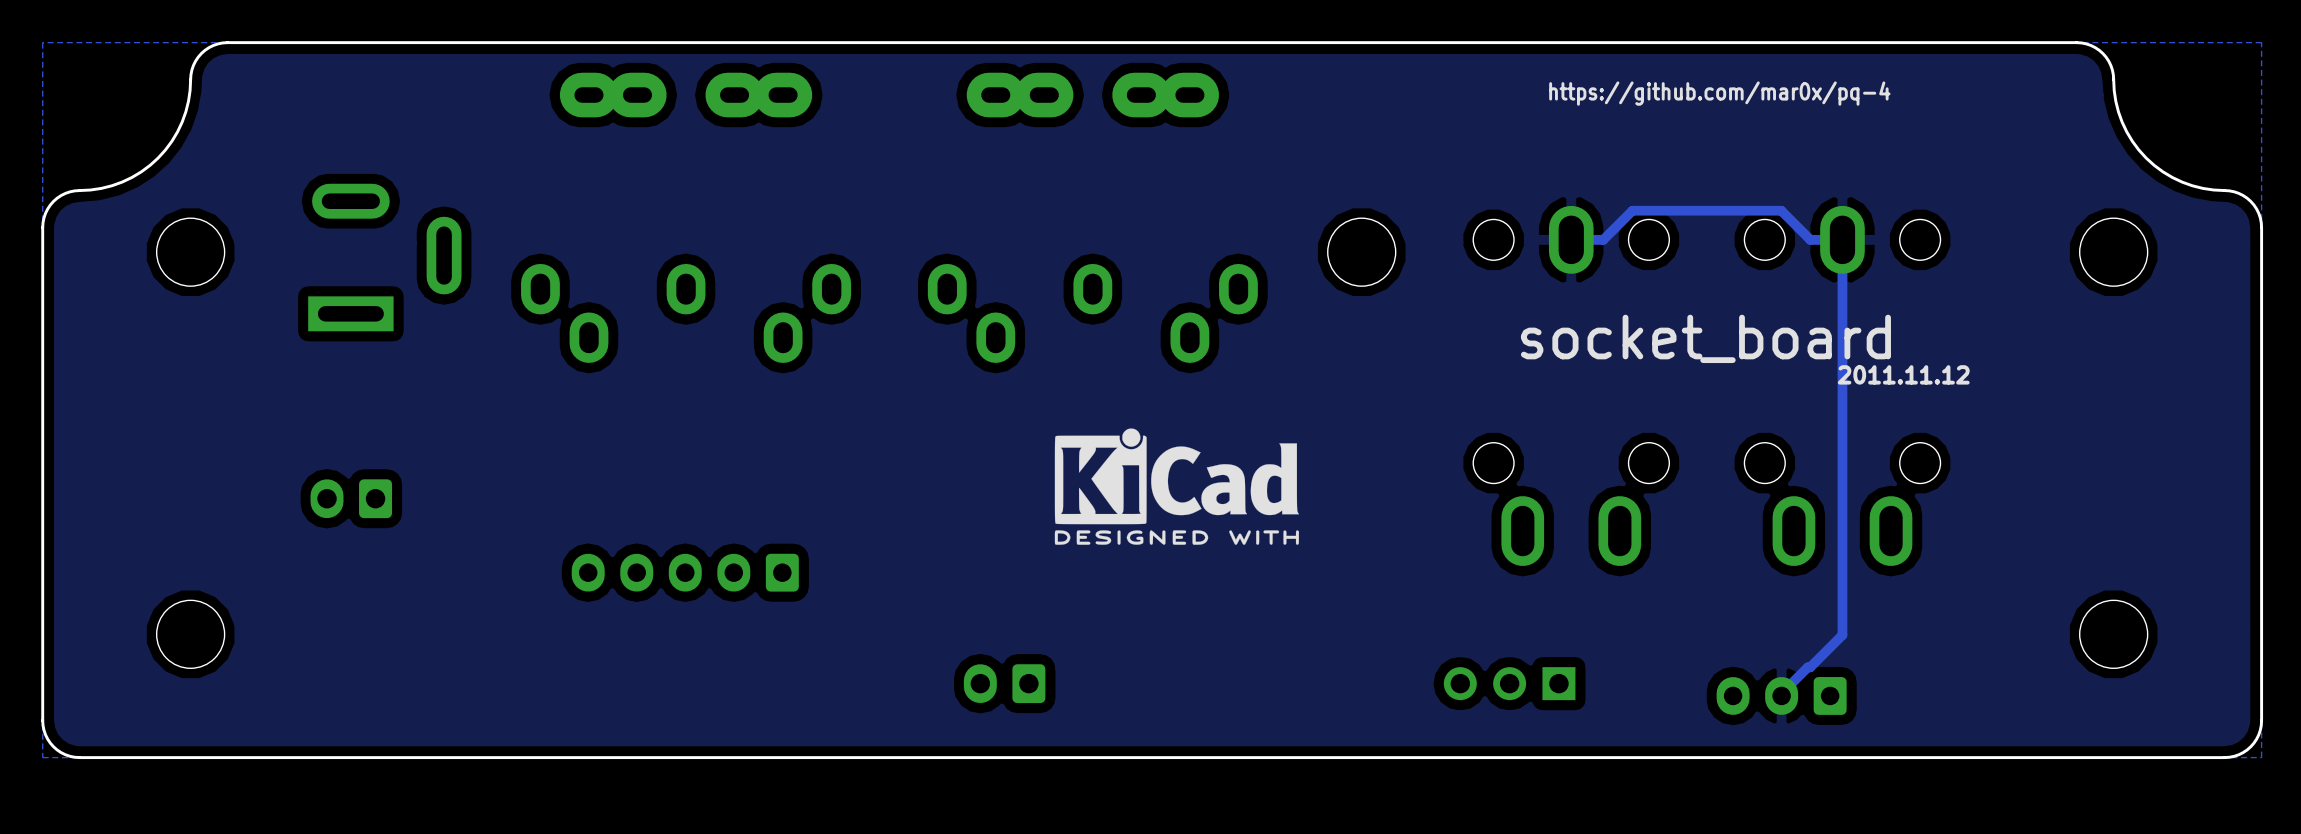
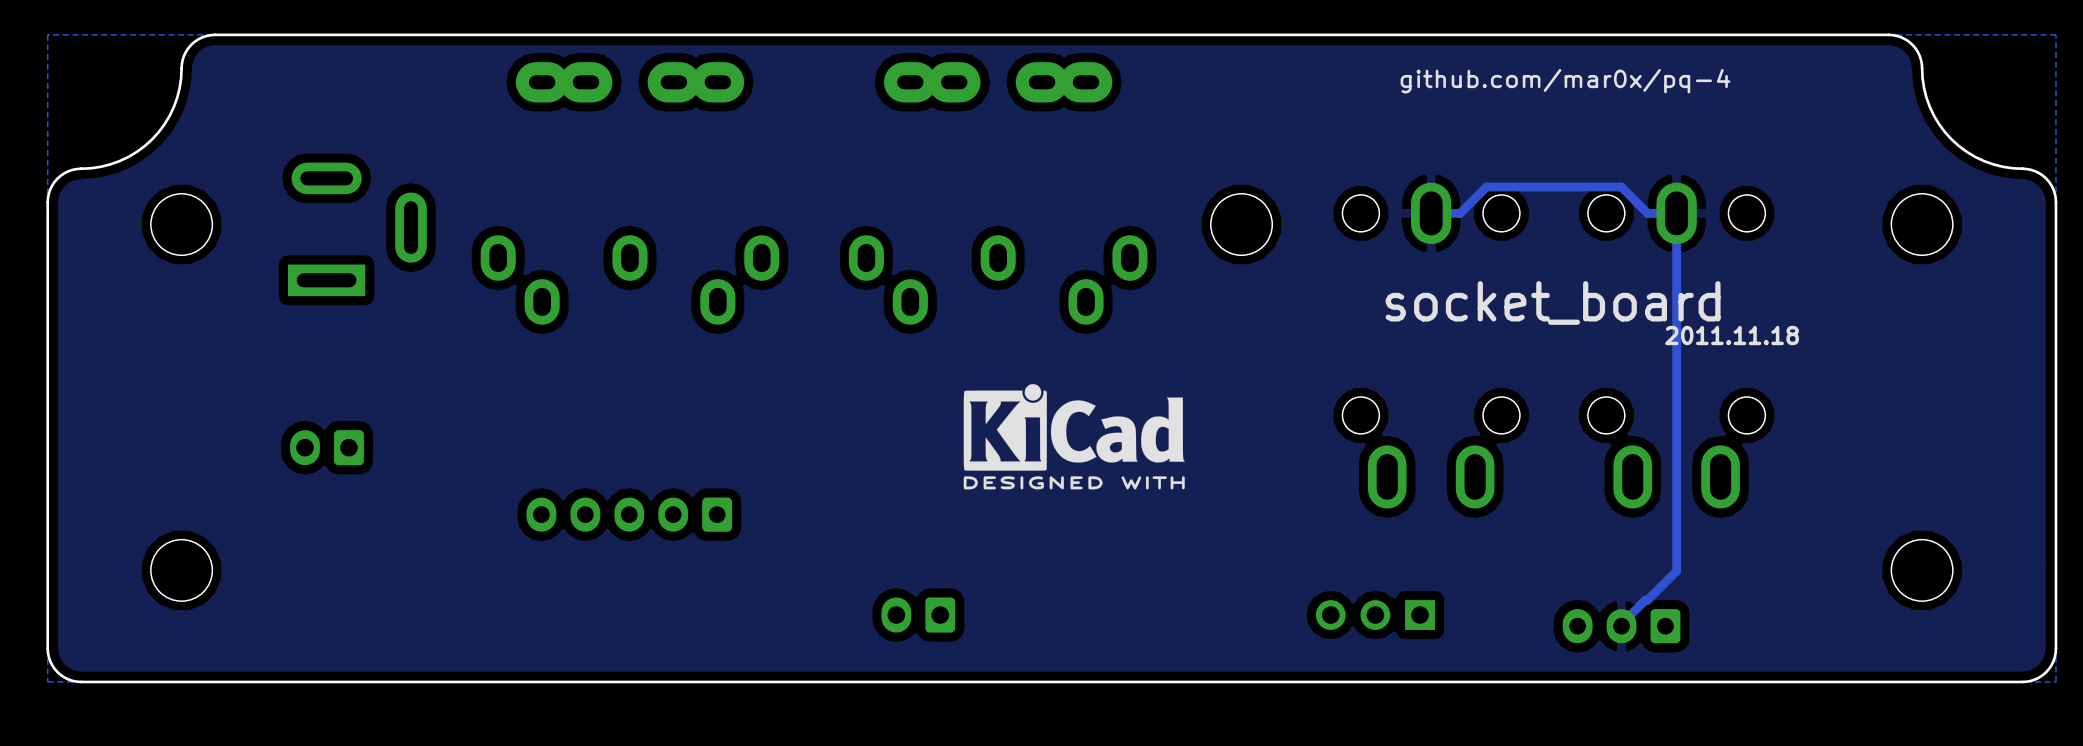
text: https://github.com/mar0x/pq-4 (1719, 93) -> github.com/mar0x/pq-4 (1565, 81)
text: 2011.11.12 (1903, 374) -> 2011.11.18 (1732, 335)

